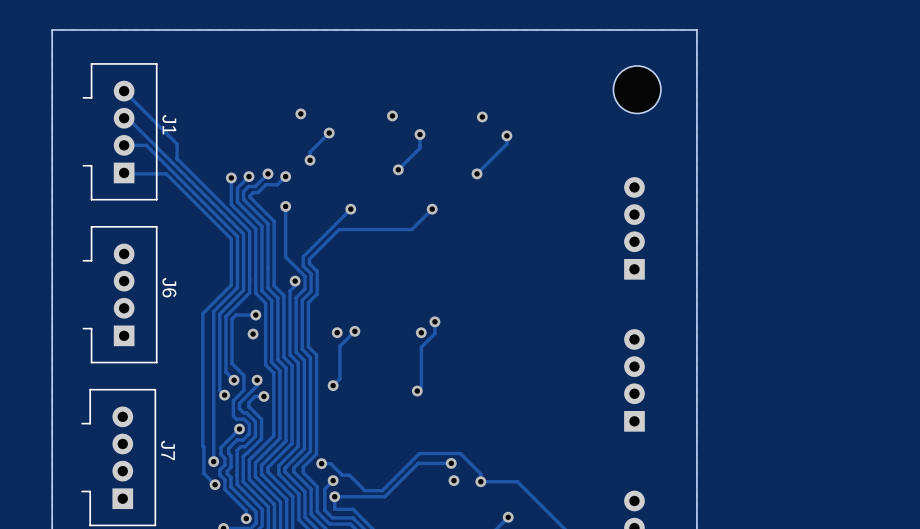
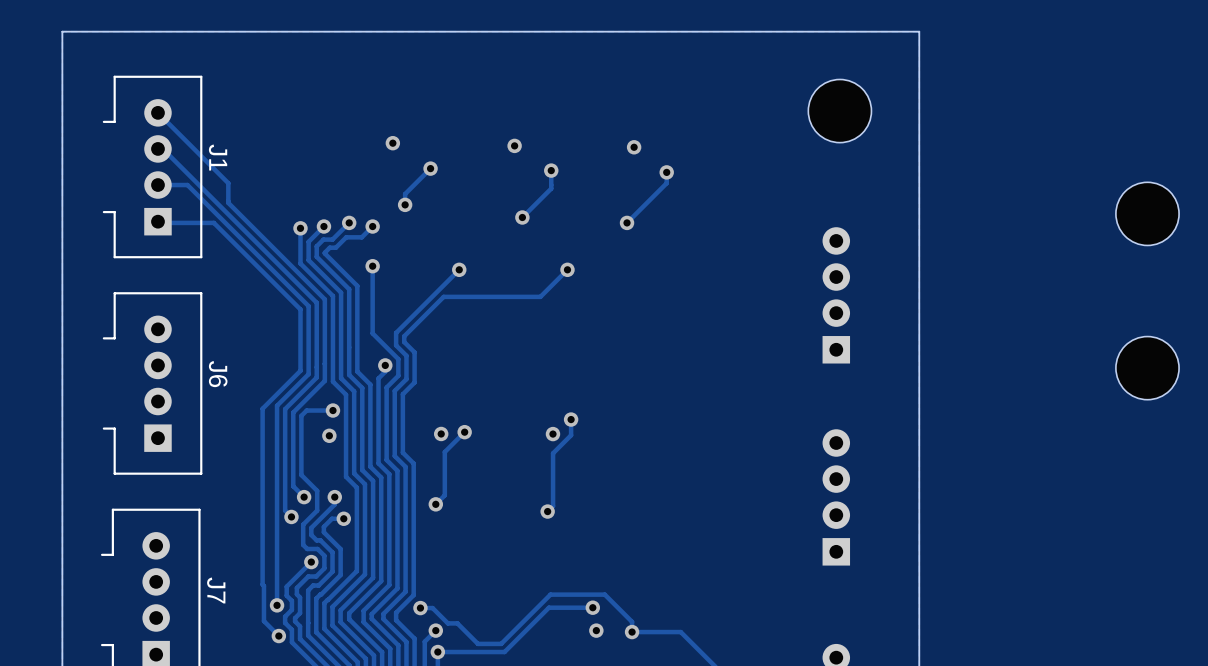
part: none -> (1147, 213)
part: none -> (1147, 368)

